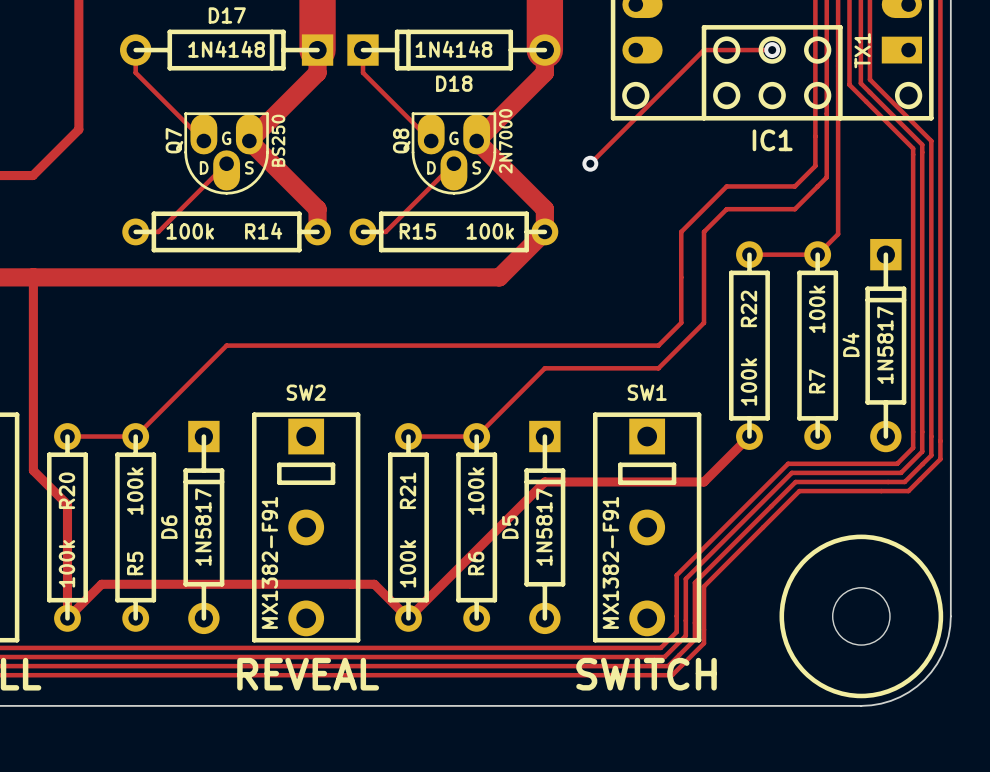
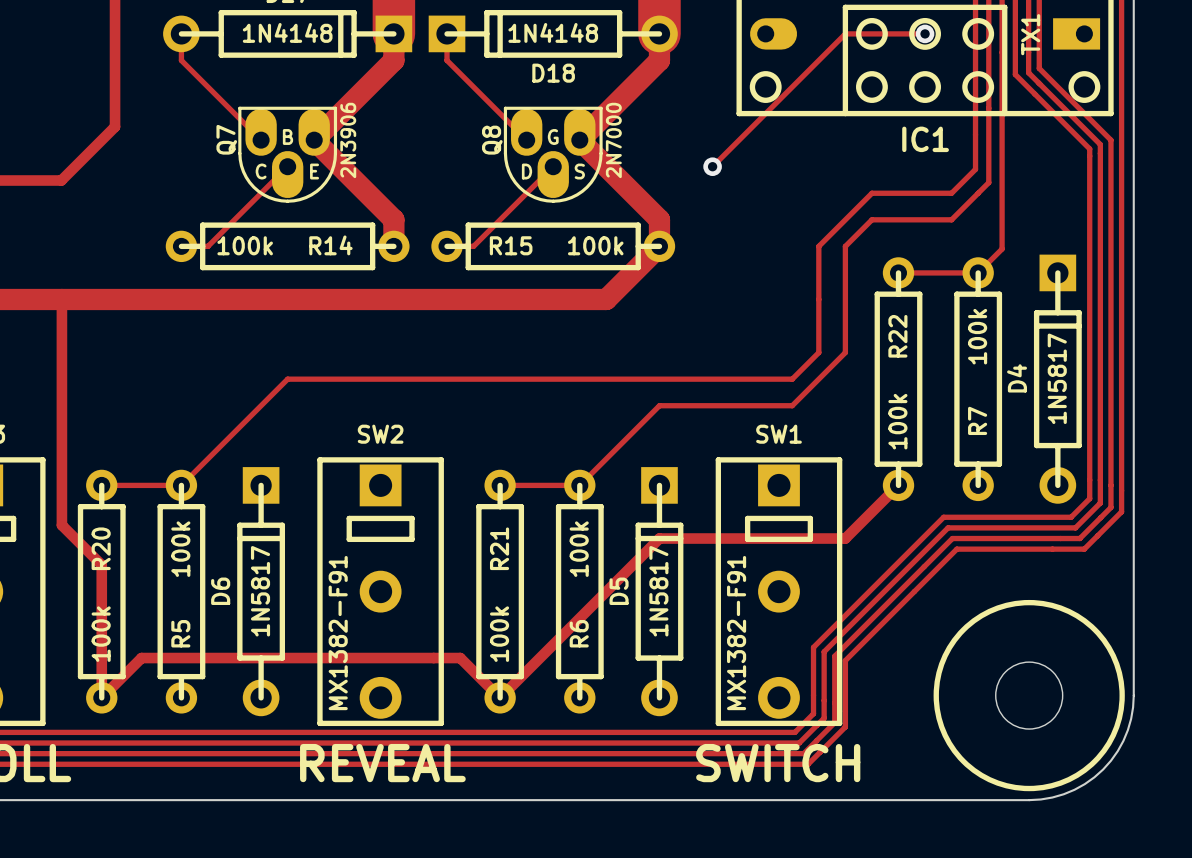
Q7 text: G (226, 138) -> B (287, 136)
Q7 value: BS250 (278, 140) -> 2N3906 (348, 140)
Q7 text: D (204, 167) -> C (261, 171)
Q7 text: S (249, 167) -> E (314, 171)

